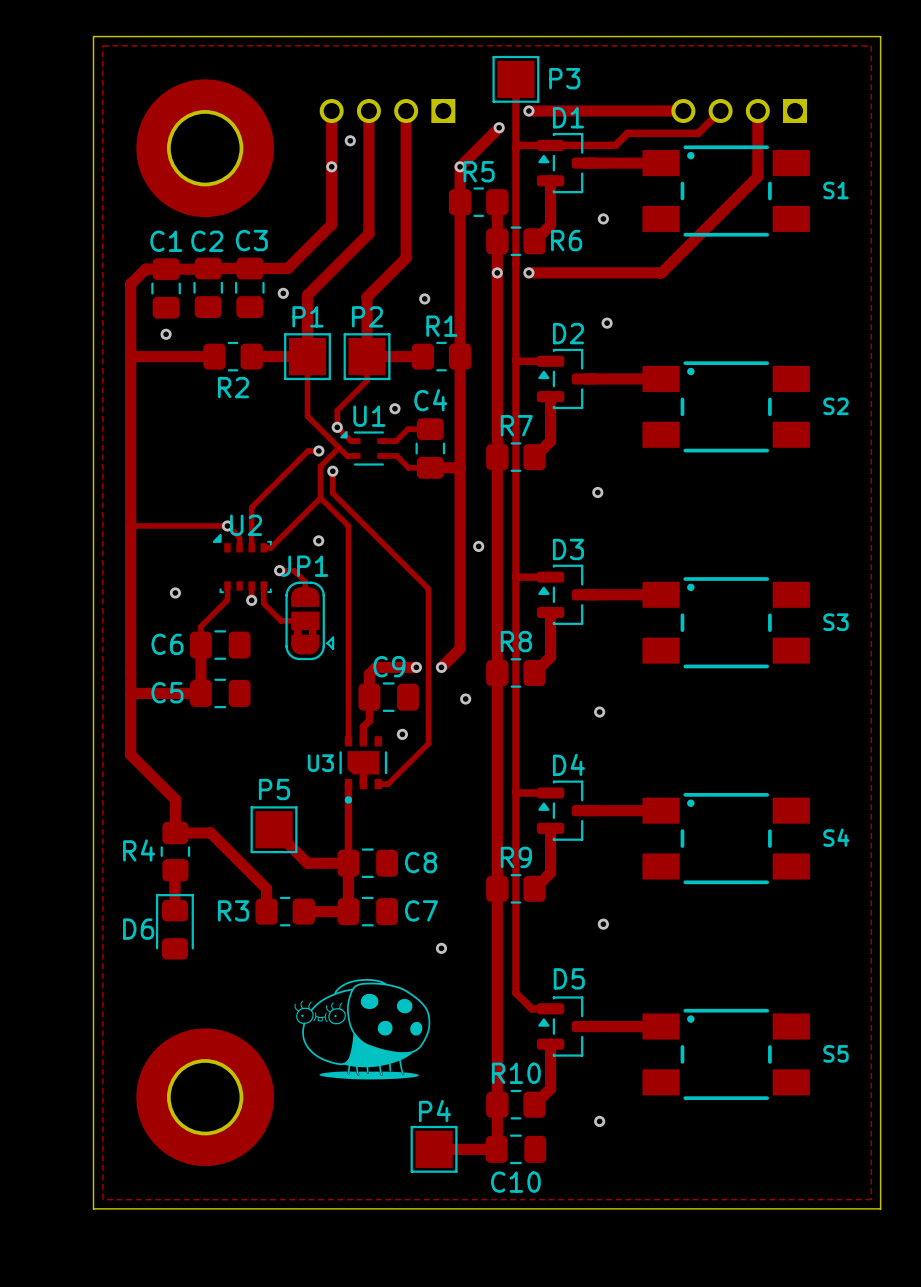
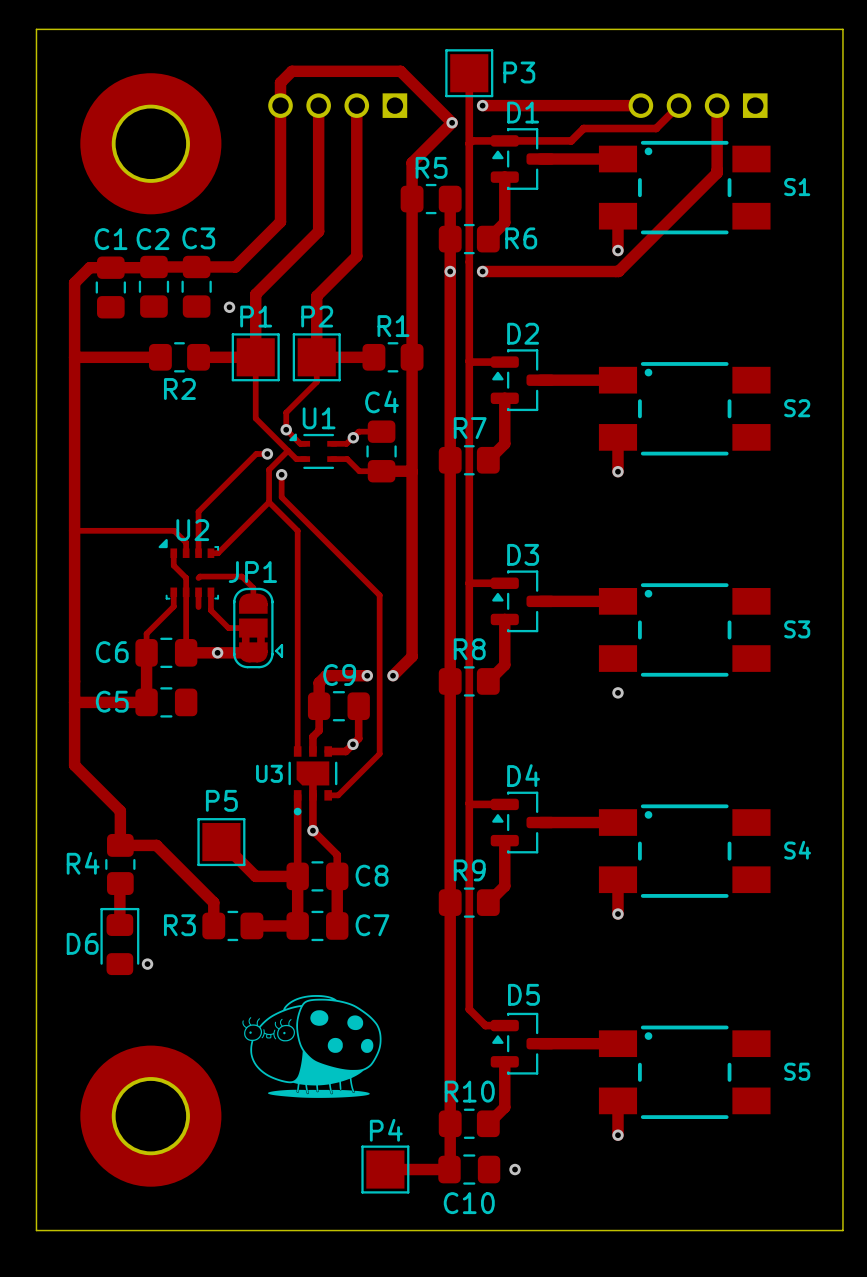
zone outline: (102, 45) (871, 45) (871, 1199) (102, 1199) (102, 45) -> none
track: none -> (280, 105) (280, 82) (291, 71) (400, 71) (452, 122)
via: (350, 140) -> none
via: (331, 166) -> none
via: (460, 166) -> none
via: (603, 218) -> none
track: none -> (617, 216) (617, 250)
via: none -> (617, 250)
via position: (283, 293) -> (229, 307)
via: (424, 298) -> none
via: (607, 323) -> none
via: (166, 334) -> none
via position: (394, 408) -> (353, 437)
track: none -> (617, 437) (617, 471)
via position: (597, 492) -> (617, 471)
via: (227, 525) -> none
via: (318, 540) -> none
via: (478, 546) -> none
track: none -> (173, 553) (173, 565) (186, 578) (186, 652) (251, 652)
track: none -> (227, 576) (198, 578)
via: (279, 570) -> none
via: (175, 592) -> none
via: (251, 600) -> none
via: none -> (217, 652)
track: none -> (358, 706) (358, 738) (345, 751) (328, 751)
via: (465, 699) -> none
via position: (599, 712) -> (617, 692)
track: none -> (312, 795) (312, 830) (337, 854) (337, 925)
via: none -> (312, 830)
track: none -> (617, 879) (617, 914)
via position: (603, 924) -> (617, 914)
via: none -> (147, 964)
via: (441, 948) -> none
track: none -> (617, 1100) (617, 1135)
via: none -> (617, 1135)
via: (599, 1121) -> none
via: none -> (515, 1169)

